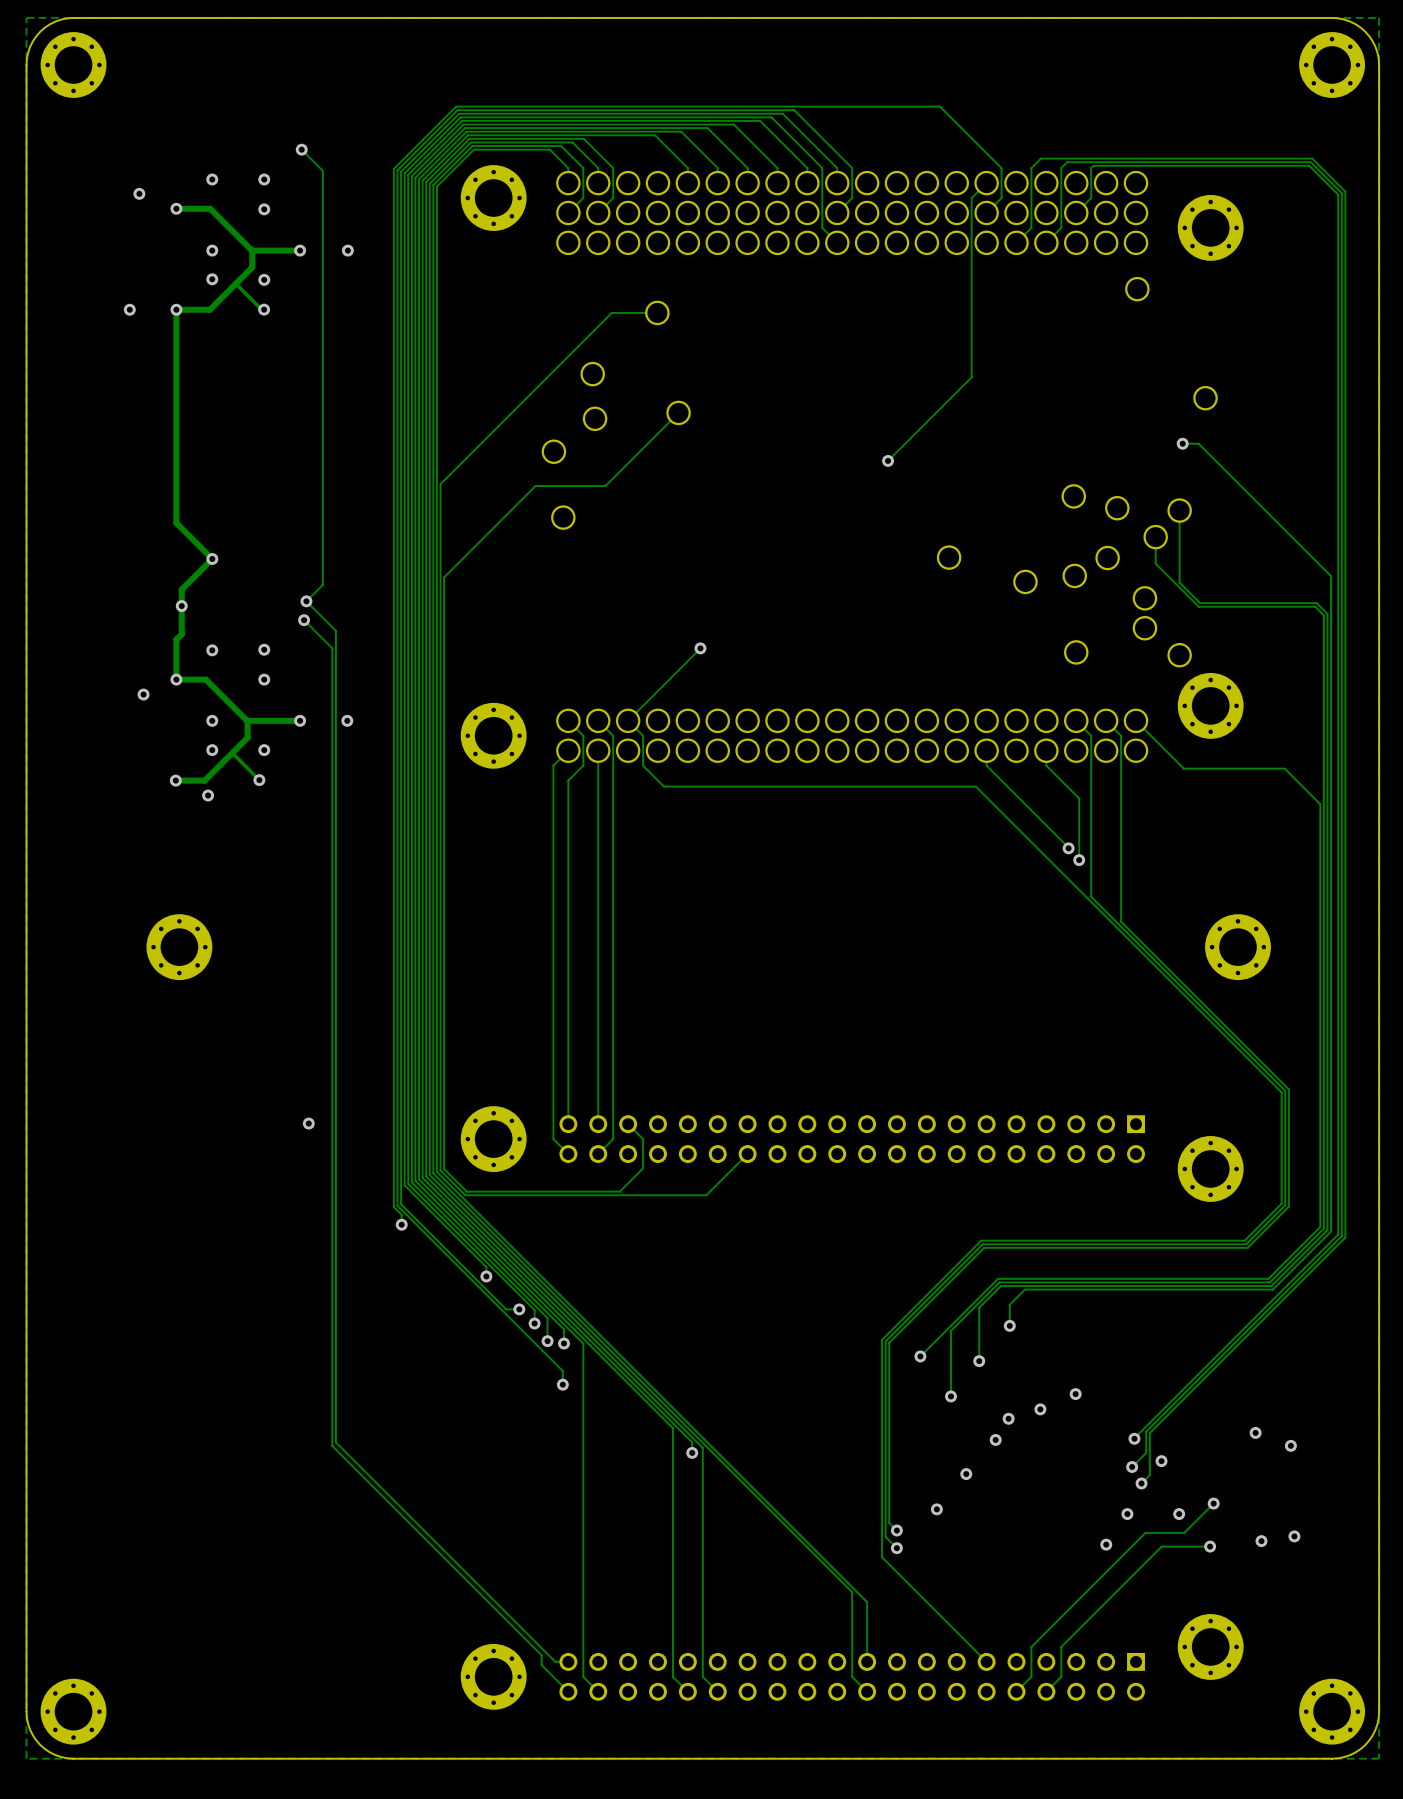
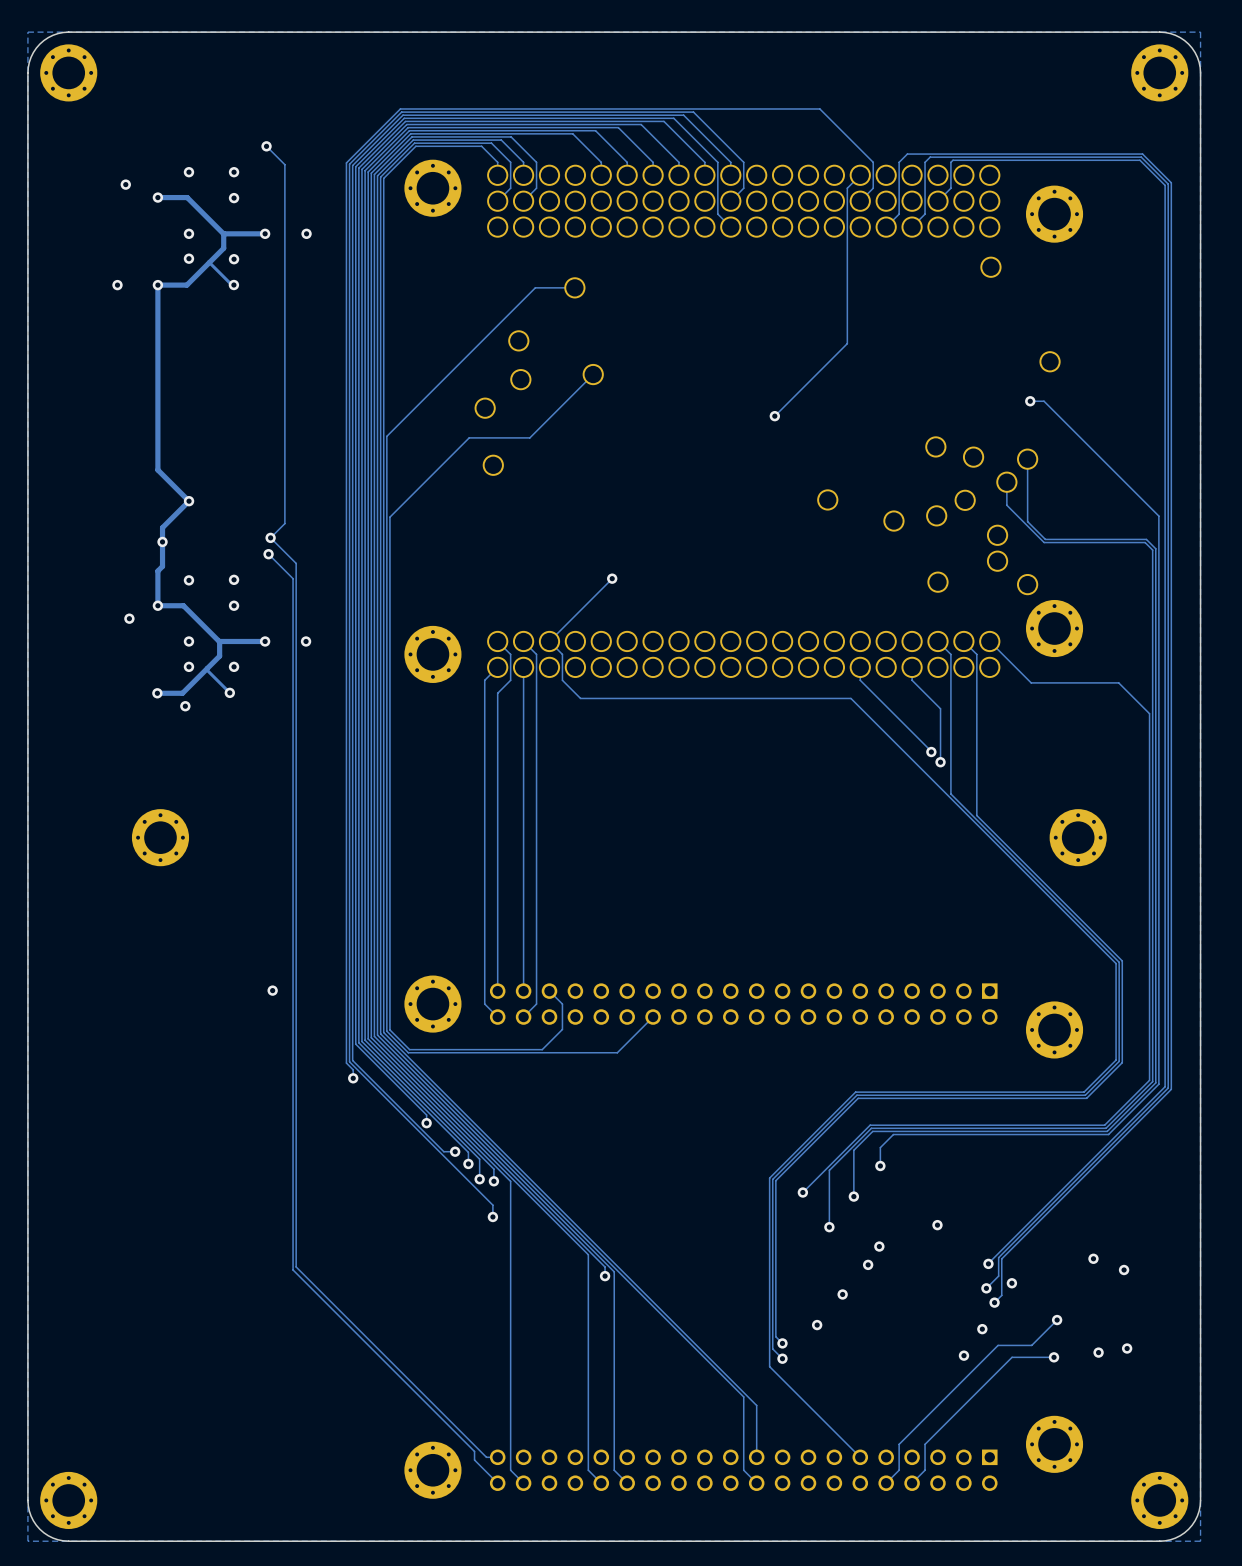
via: (1040, 1409) -> none
via: (1179, 1514) -> none

